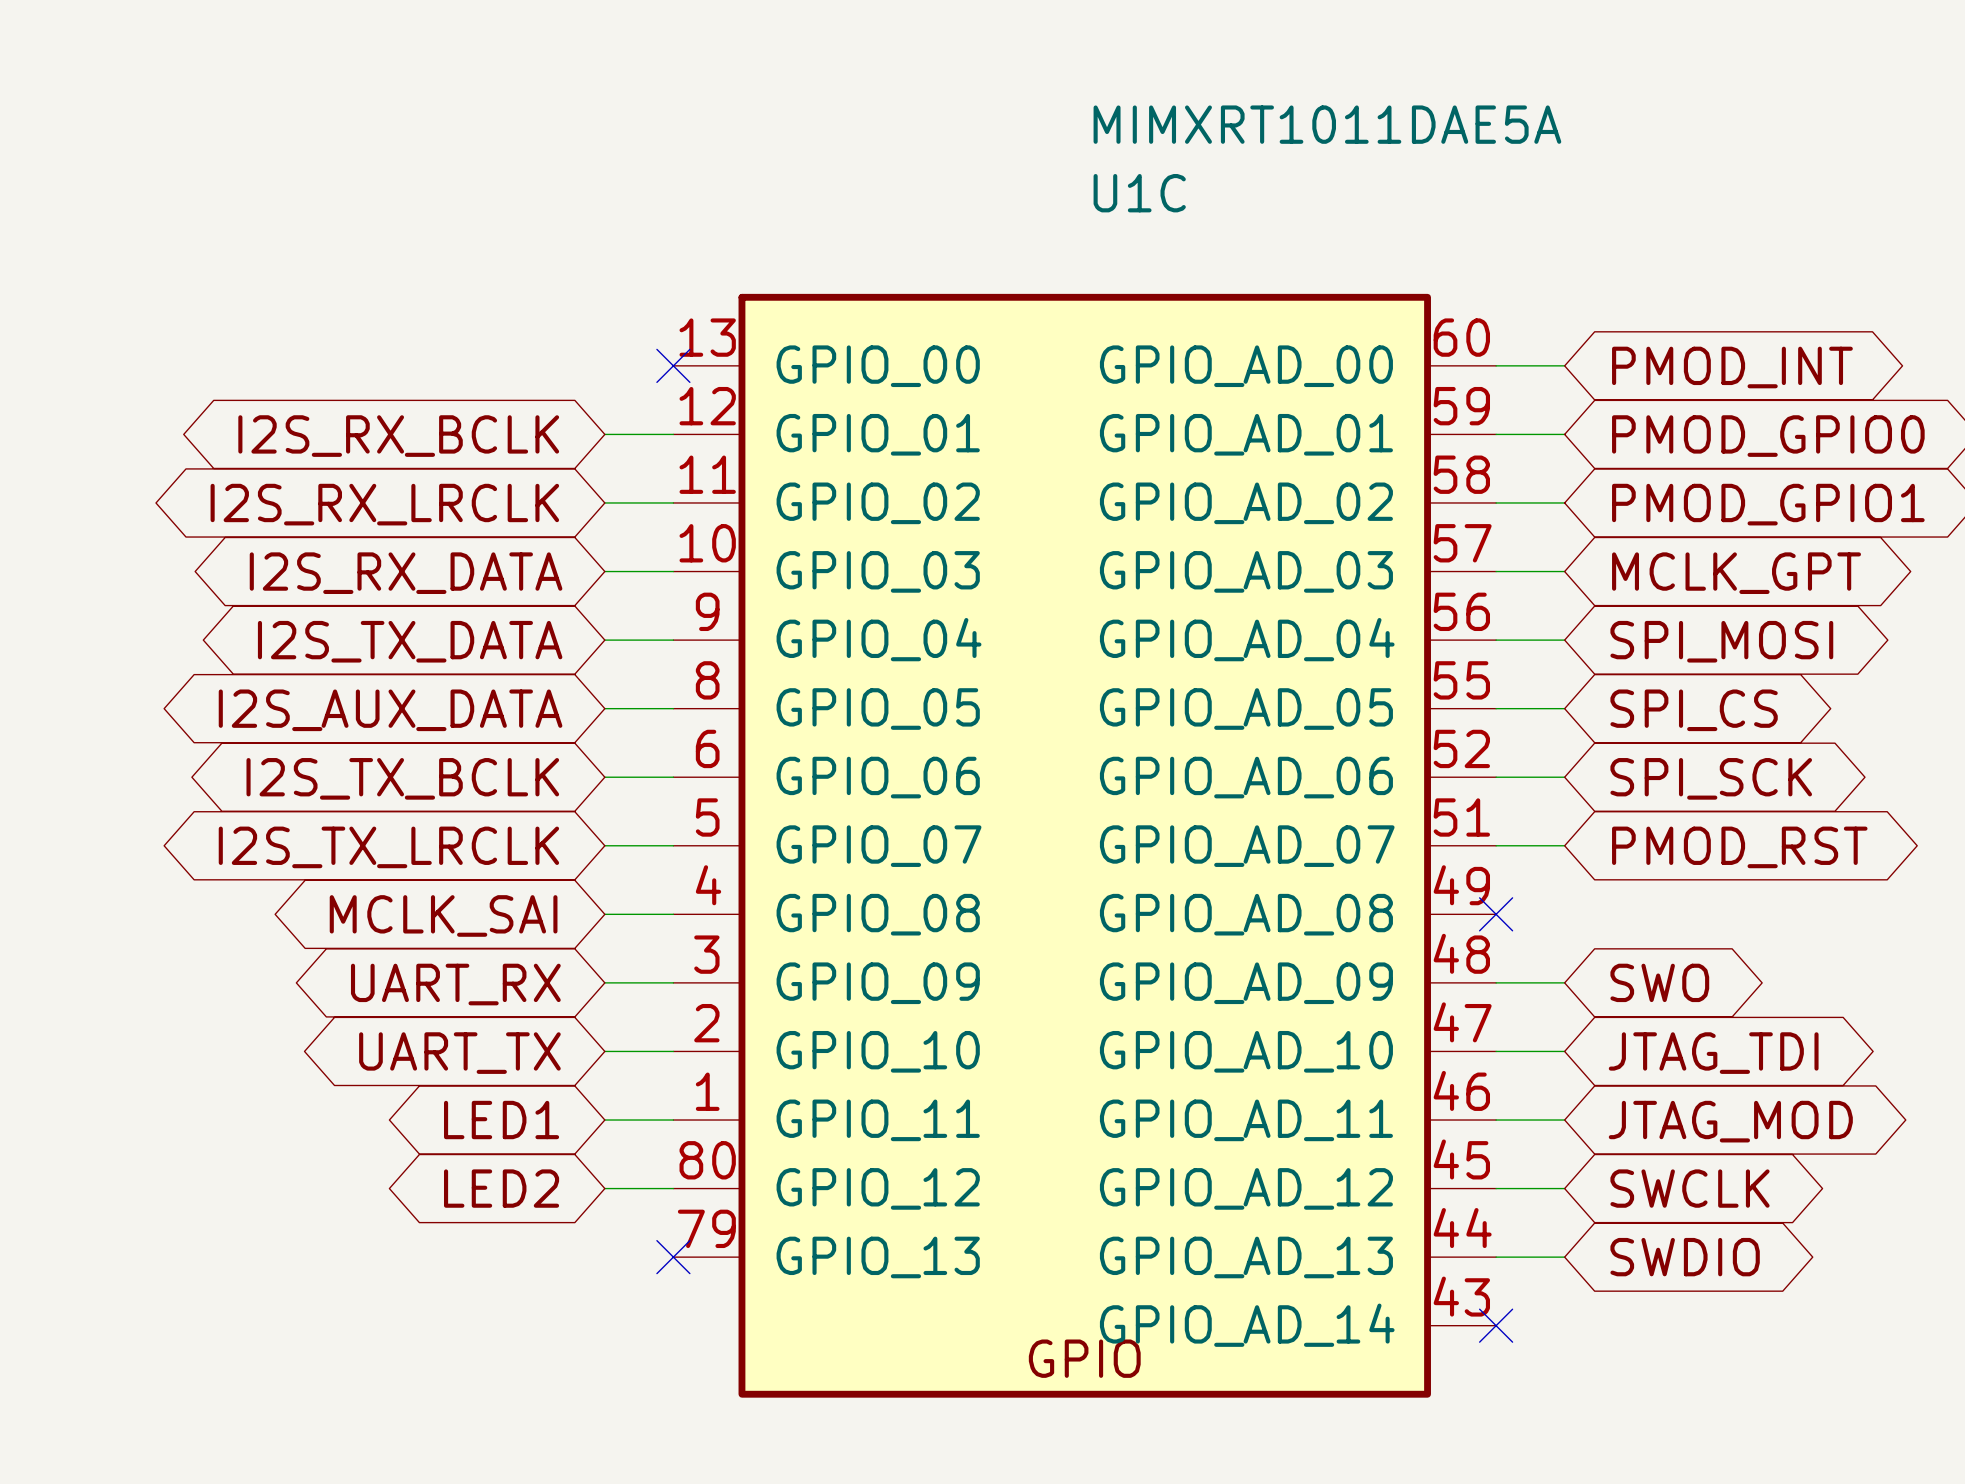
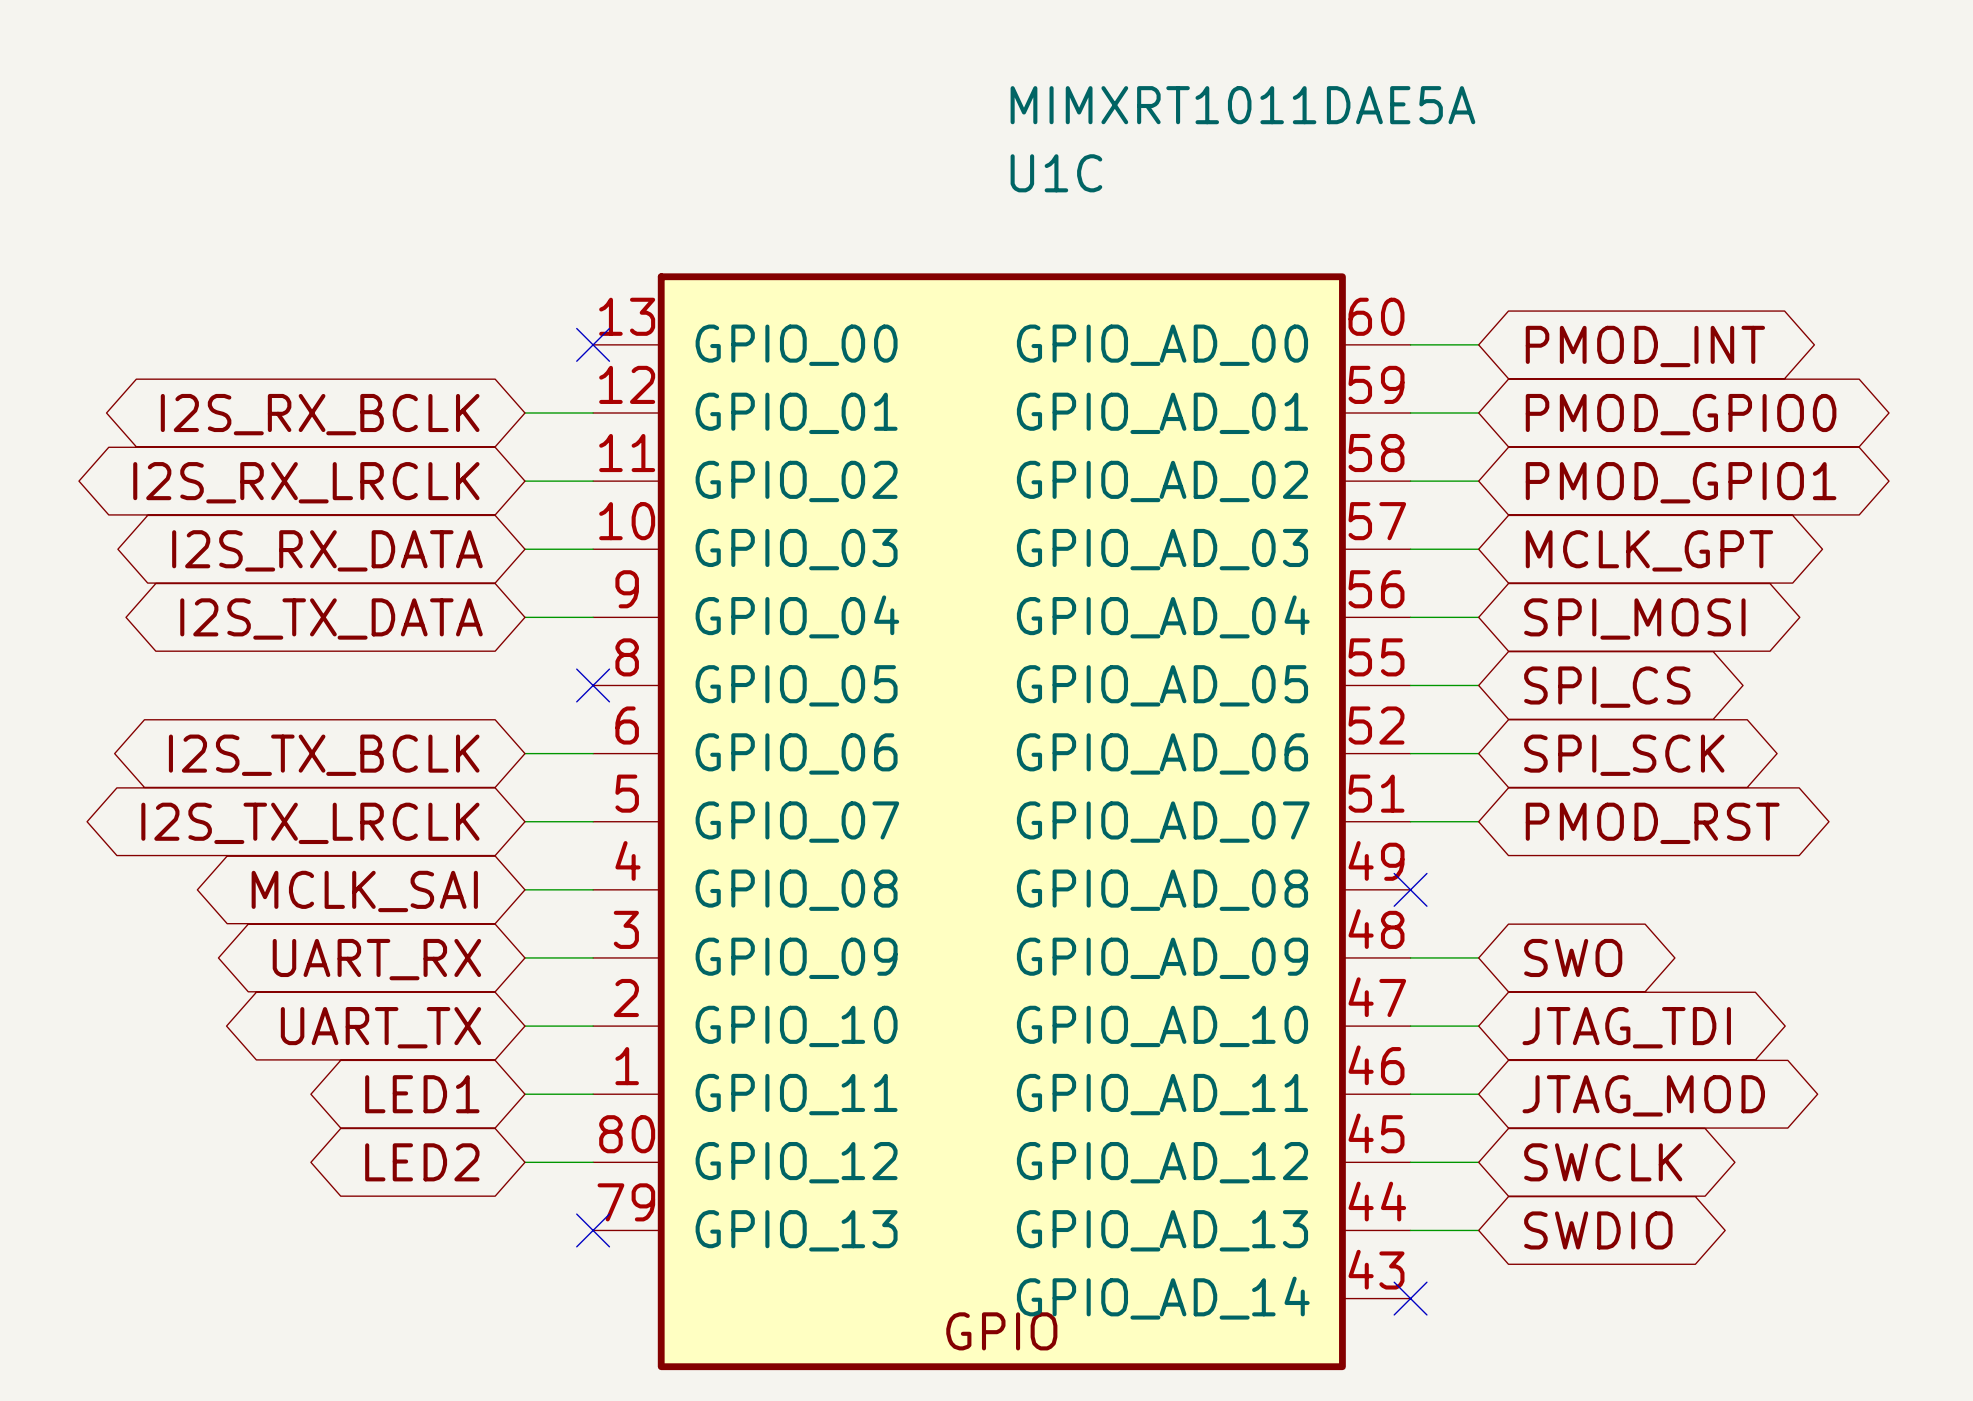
wire: (604, 708) (673, 708) -> none
no-connect mark: none -> (593, 685)
global label: I2S_AUX_DATA (390, 710) -> none

